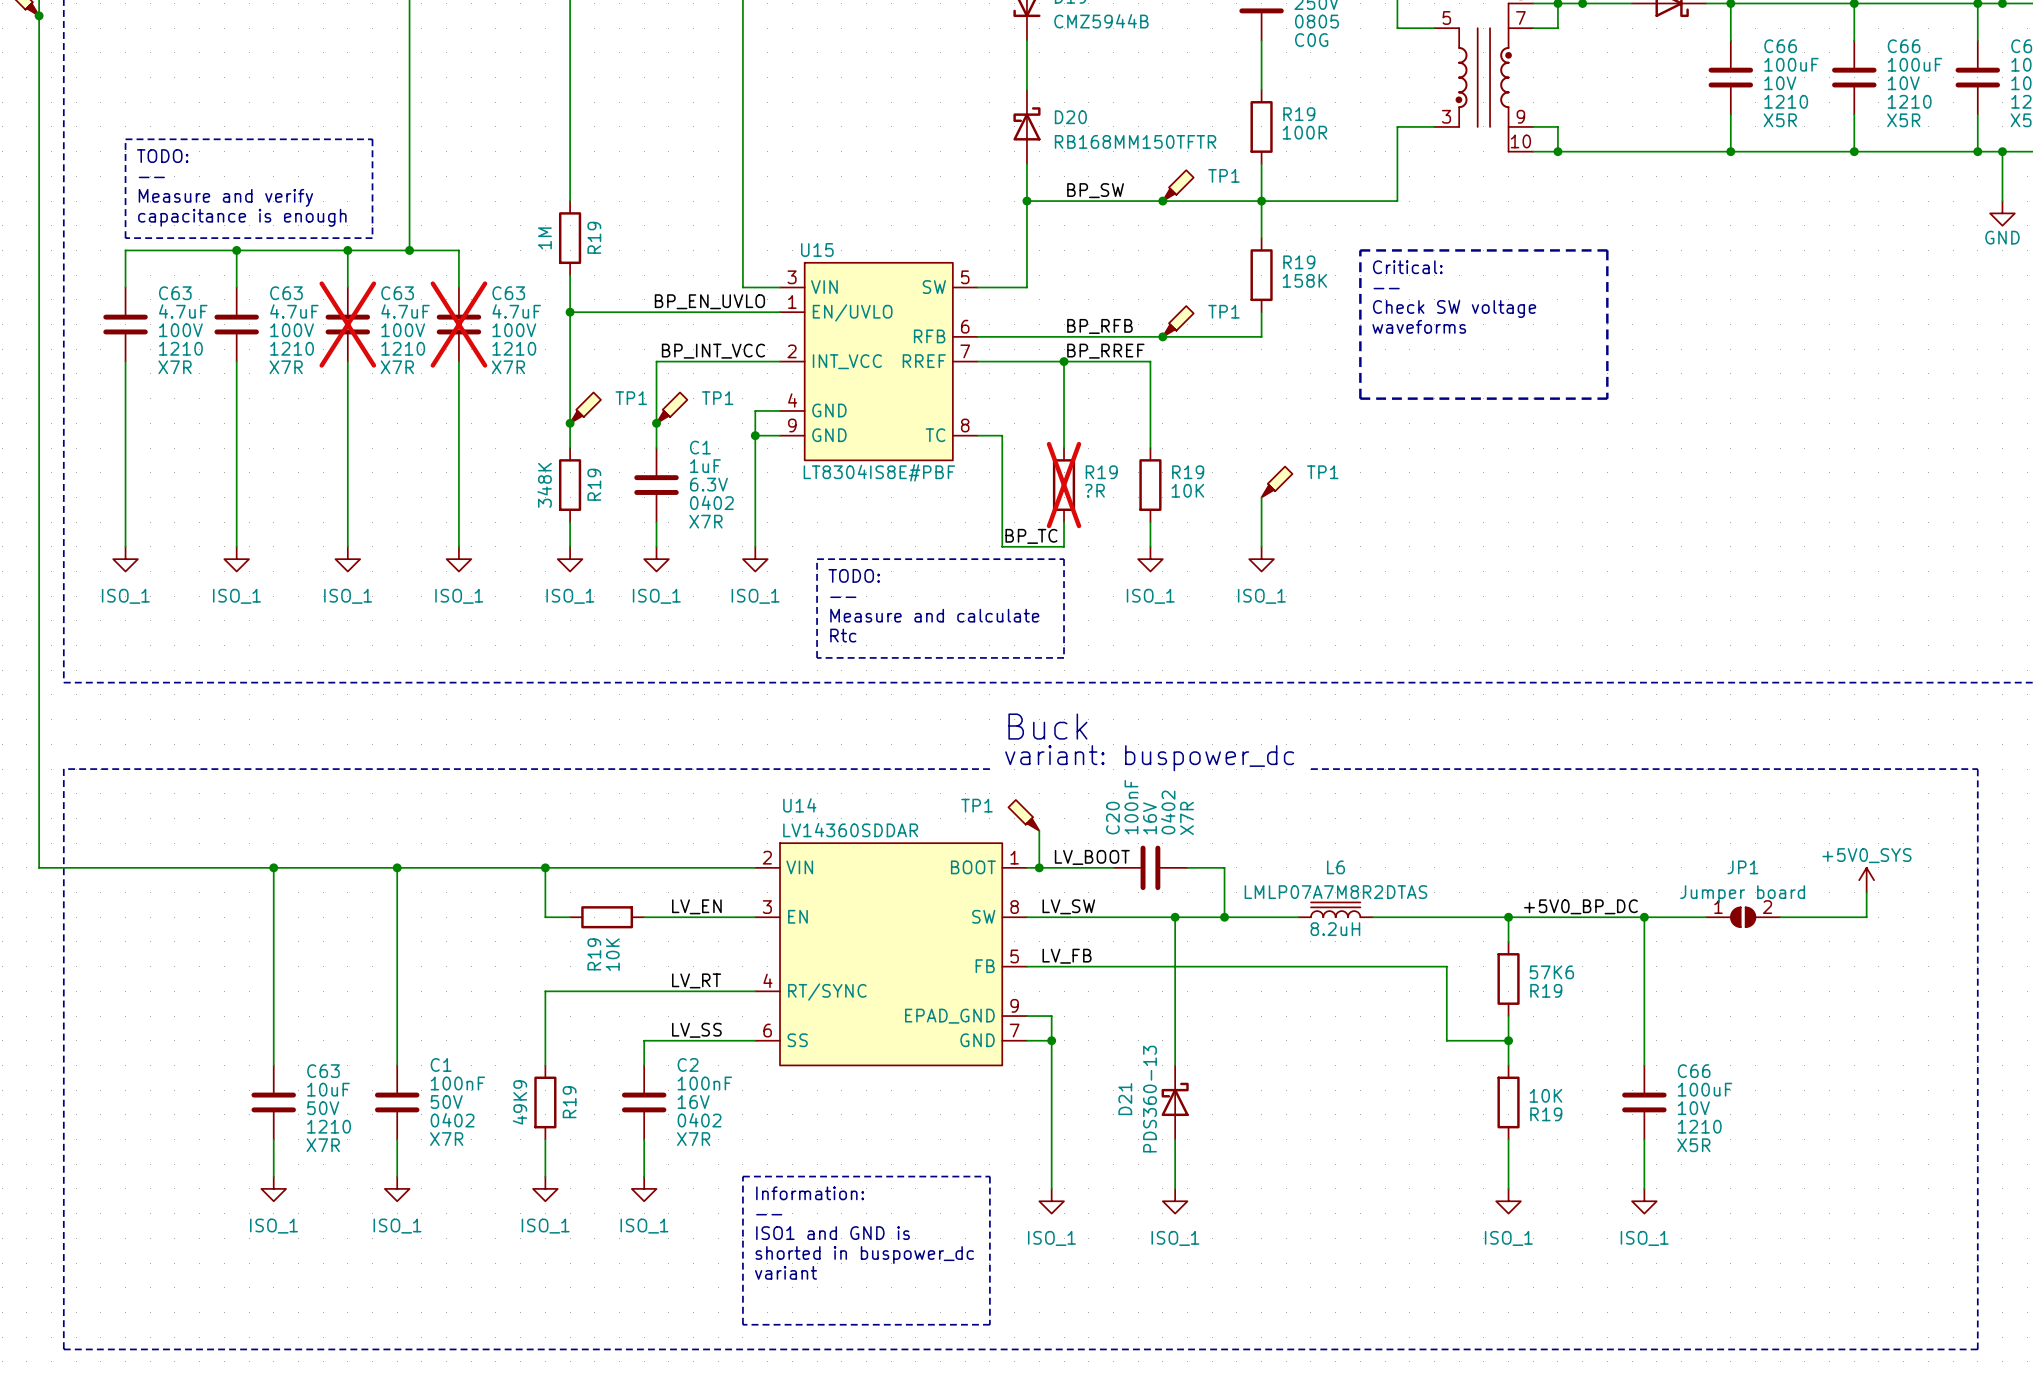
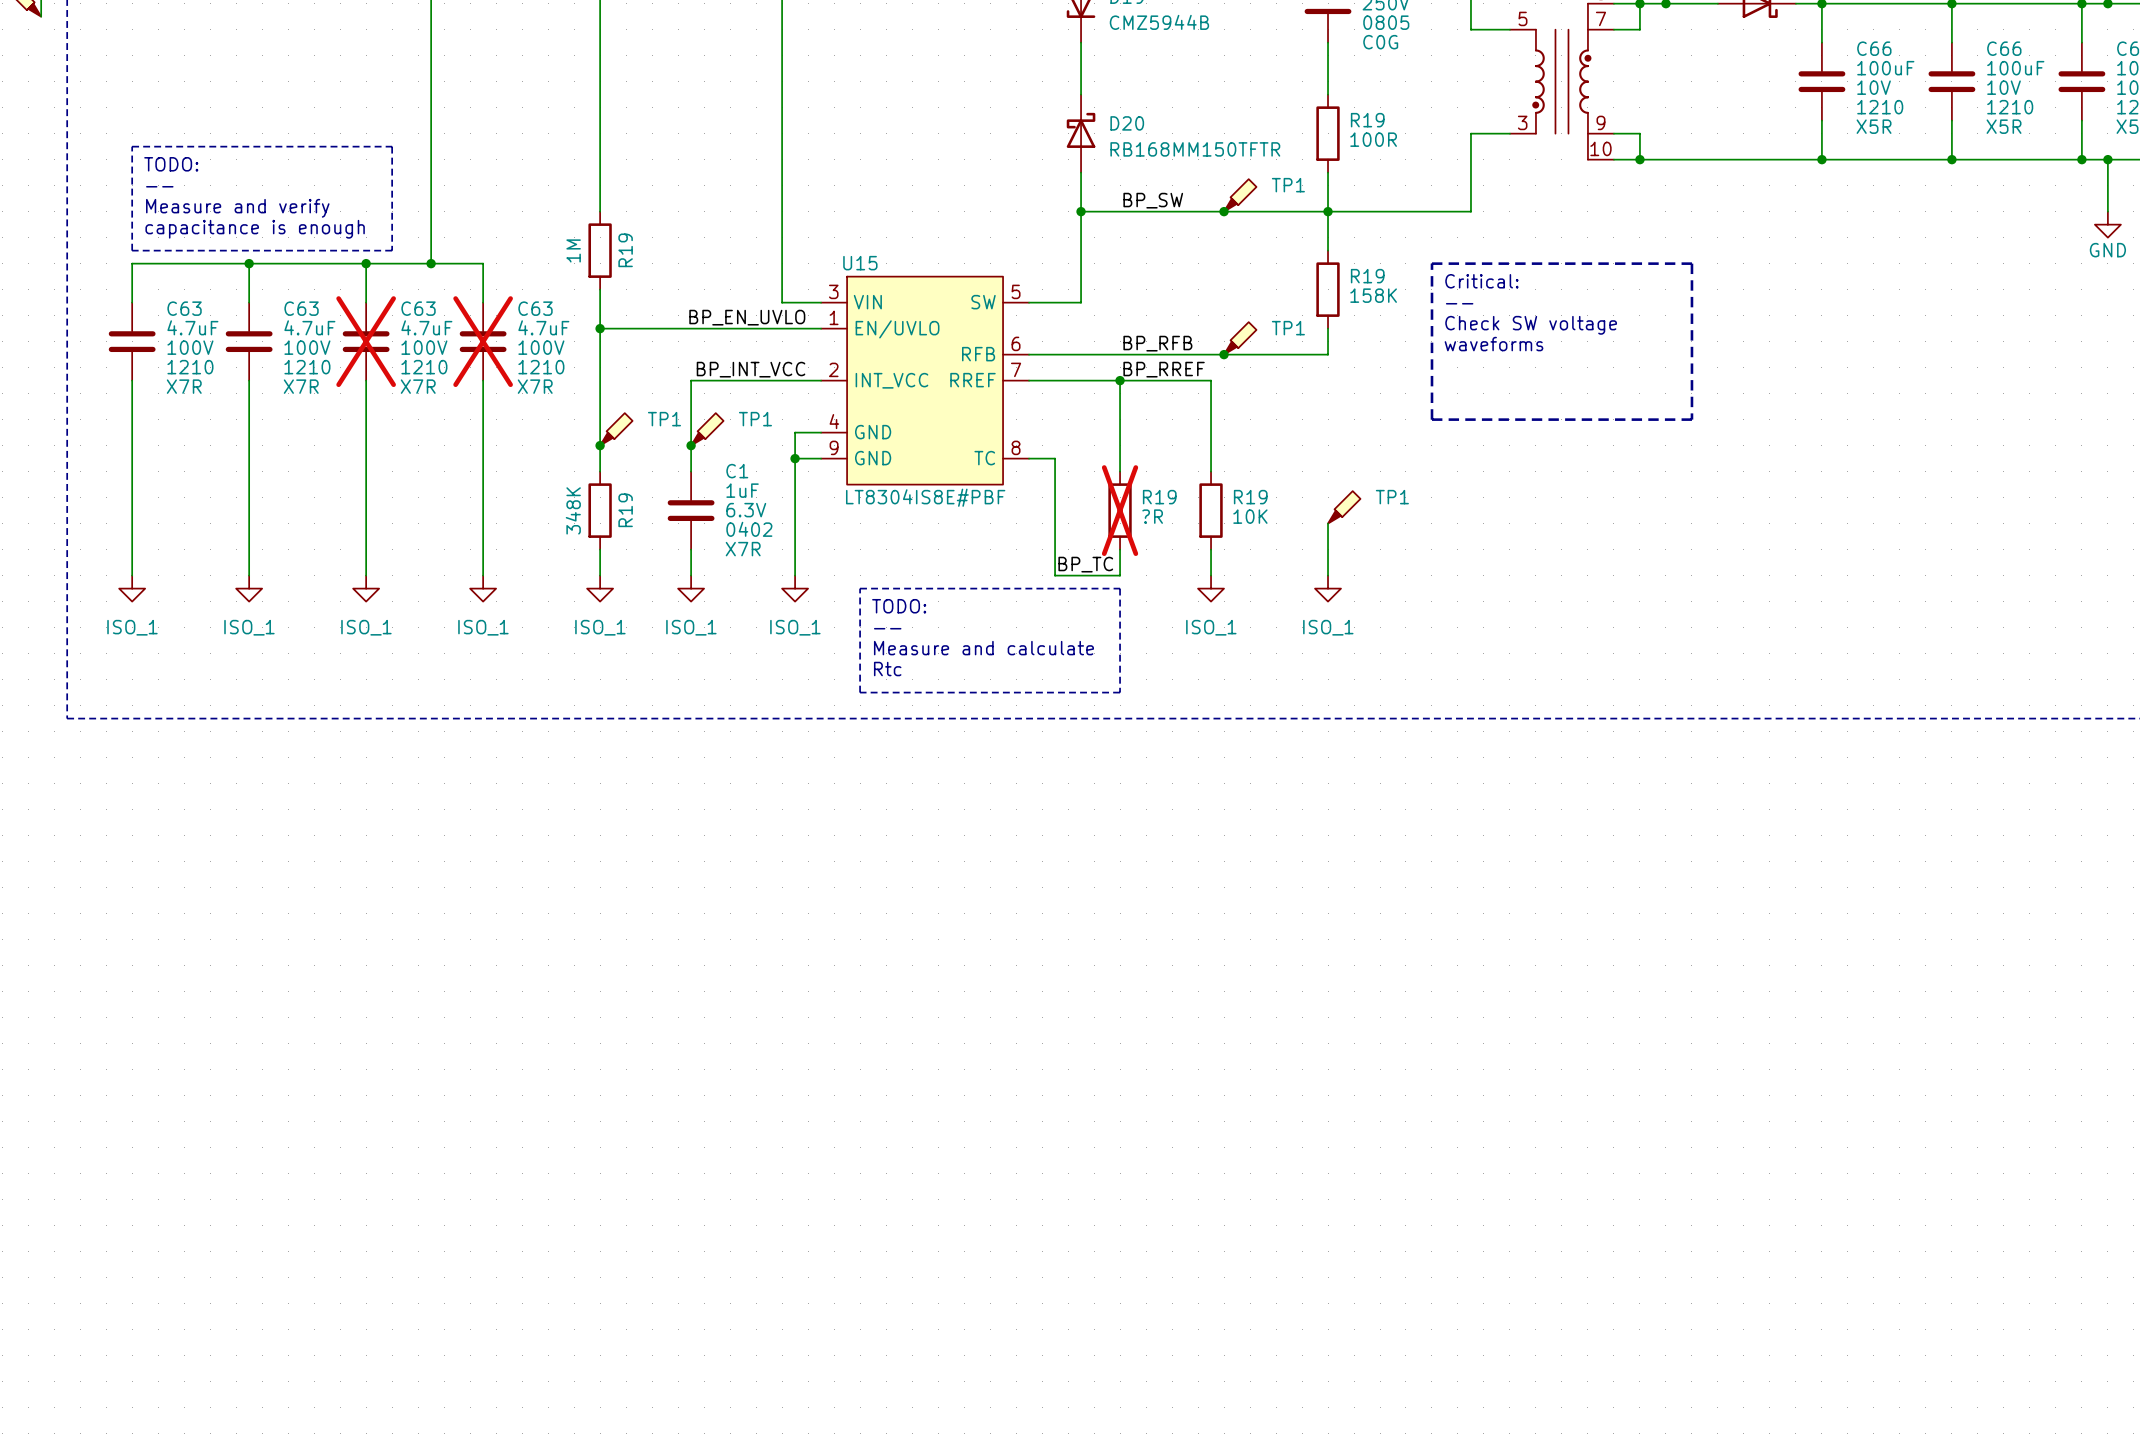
wire: (39, 15) (39, 867) (755, 867) -> none
junction: (39, 15) -> none
text: Buck (1047, 726) -> none
text: variant: buspower_dc (1149, 758) -> none
line: (989, 769) (63, 769) (63, 1349) (1977, 1349) (1977, 769) (1310, 769) -> none
TP1: (1023, 815) -> none
wire: (1039, 830) (1039, 867) -> none
label: LV_BOOT (1092, 857) -> none
wire: (273, 867) (273, 1065) -> none
junction: (273, 867) -> none
wire: (397, 867) (397, 1065) -> none
junction: (397, 867) -> none
wire: (545, 867) (545, 917) (570, 917) -> none
junction: (545, 867) -> none
wire: (1026, 867) (1113, 867) -> none
junction: (1039, 867) -> none
C20: 100nF (1150, 867) -> none
wire: (1187, 867) (1224, 867) (1224, 917) -> none
power symbol: +5V0_SYS (1866, 880) -> none
wire: (1866, 892) (1866, 917) (1780, 917) -> none
label: LV_EN (696, 906) -> none
label: LV_SW (1068, 906) -> none
label: +5V0_BP_DC (1580, 906) -> none
L6: LMLP07A7M8R2DTAS (1335, 909) -> none
R19: 10K (607, 917) -> none
wire: (644, 917) (755, 917) -> none
wire: (1026, 917) (1298, 917) -> none
wire: (1175, 917) (1175, 1065) -> none
junction: (1175, 917) -> none
junction: (1224, 917) -> none
wire: (1372, 917) (1706, 917) -> none
wire: (1508, 917) (1508, 941) -> none
junction: (1508, 917) -> none
wire: (1644, 917) (1644, 1065) -> none
junction: (1644, 917) -> none
JP1: Jumper board (1743, 917) -> none
U14: LV14360SDDAR (891, 954) -> none
label: LV_FB (1067, 956) -> none
wire: (1026, 966) (1446, 966) (1446, 1040) (1508, 1040) -> none
R19: 57K6 (1508, 978) -> none
label: LV_RT (696, 980) -> none
wire: (755, 991) (545, 991) (545, 1065) -> none
wire: (1026, 1016) (1051, 1016) (1051, 1188) -> none
wire: (1508, 1016) (1508, 1065) -> none
label: LV_SS (696, 1030) -> none
wire: (755, 1040) (644, 1040) (644, 1065) -> none
wire: (1026, 1040) (1051, 1040) -> none
junction: (1051, 1040) -> none
junction: (1508, 1040) -> none
C63: 10uF (273, 1102) -> none
C1: 100nF (397, 1102) -> none
R19: 49K9 (545, 1102) -> none
C2: 100nF (644, 1102) -> none
D21: PDS360-13 (1175, 1102) -> none
R19: 10K (1508, 1102) -> none
C66: 100uF (1644, 1102) -> none
wire: (273, 1139) (273, 1176) -> none
wire: (397, 1139) (397, 1176) -> none
wire: (545, 1139) (545, 1176) -> none
wire: (644, 1139) (644, 1176) -> none
wire: (1175, 1139) (1175, 1188) -> none
wire: (1508, 1139) (1508, 1188) -> none
wire: (1644, 1139) (1644, 1188) -> none
line: (742, 1176) (989, 1176) (989, 1324) (742, 1324) (742, 1176) -> none
power symbol: ISO_1 (273, 1188) -> none
power symbol: ISO_1 (397, 1188) -> none
power symbol: ISO_1 (545, 1188) -> none
power symbol: ISO_1 (644, 1188) -> none
text: Information: (810, 1193) -> none
power symbol: ISO_1 (1051, 1201) -> none
power symbol: ISO_1 (1175, 1201) -> none
power symbol: ISO_1 (1508, 1201) -> none
power symbol: ISO_1 (1644, 1201) -> none
text: -- (769, 1214) -> none
text: ISO1 and GND is (833, 1233) -> none
text: shorted in buspower_dc (864, 1255) -> none
text: variant (785, 1272) -> none

